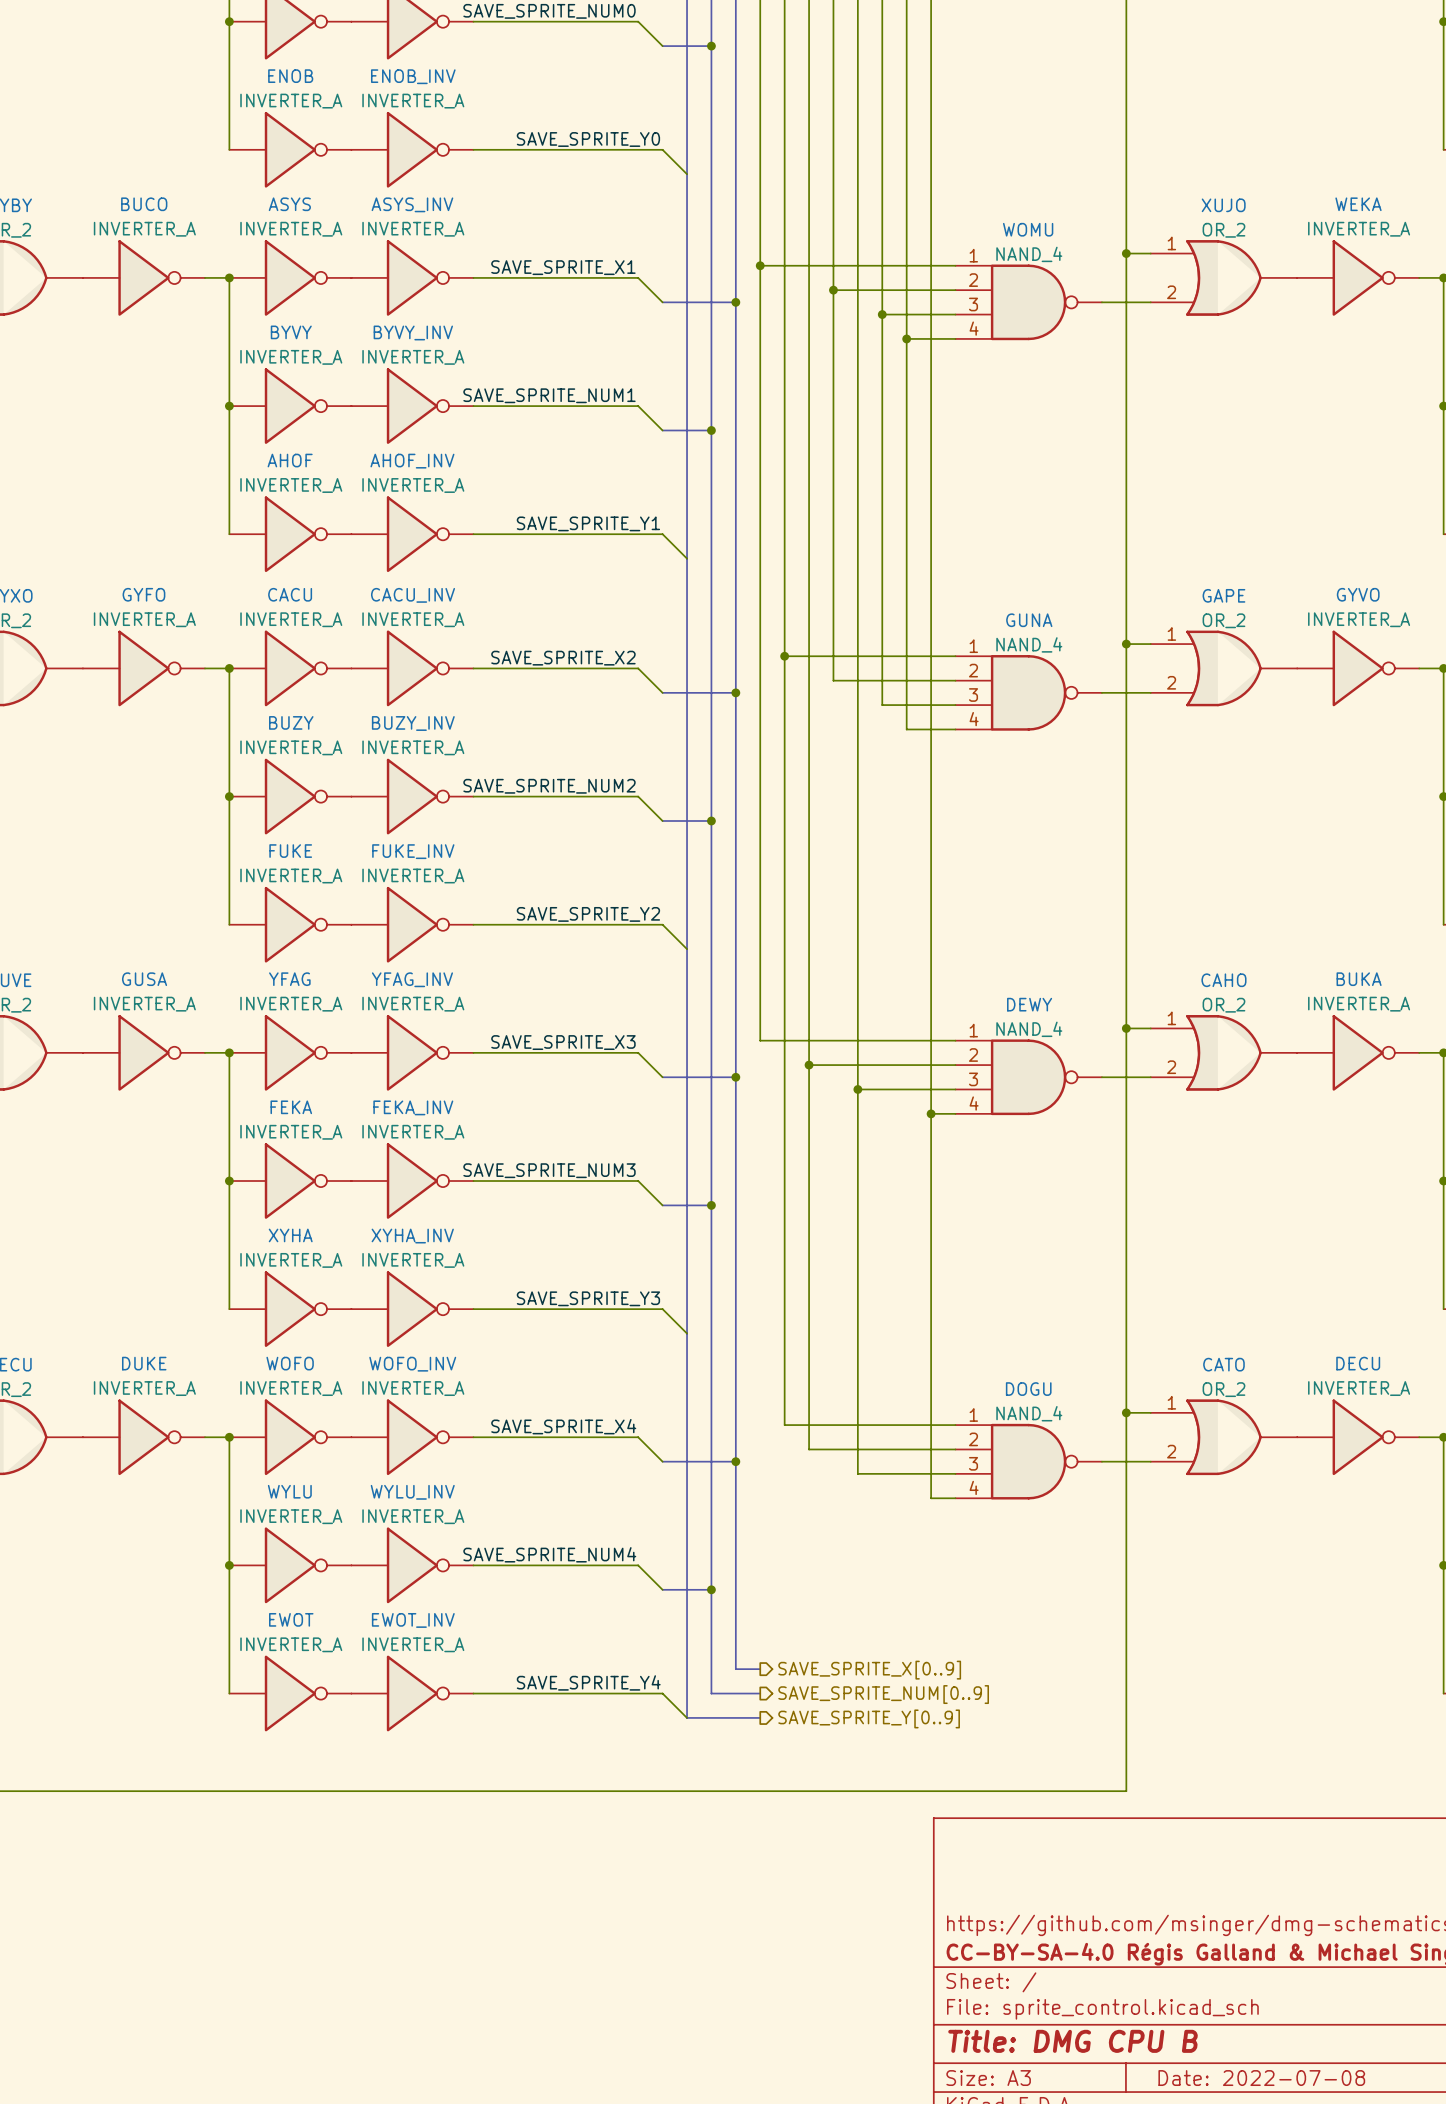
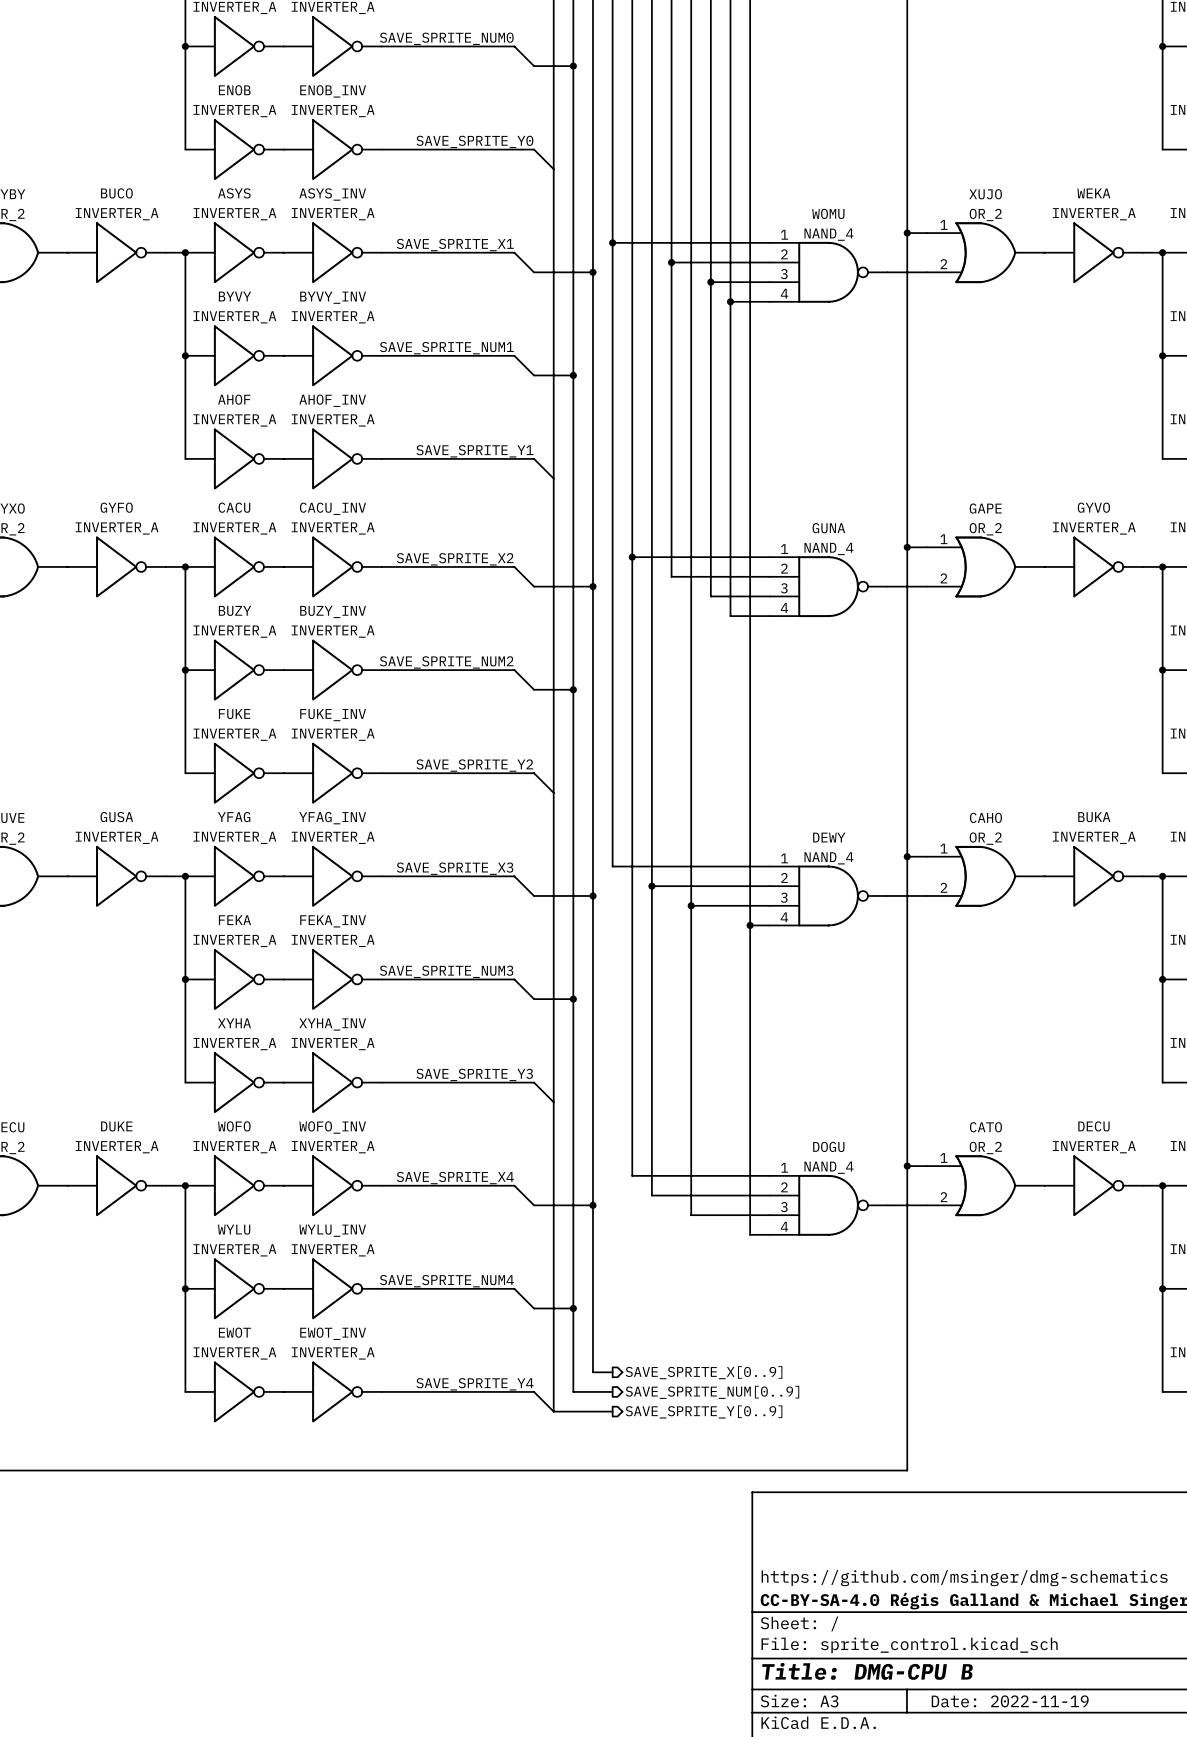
title block: Title: DMG CPU B (1073, 2041) -> Title: DMG-CPU B (867, 1671)
title block: Date: 2022-07-08 (1261, 2078) -> Date: 2022-11-19 (1010, 1701)

